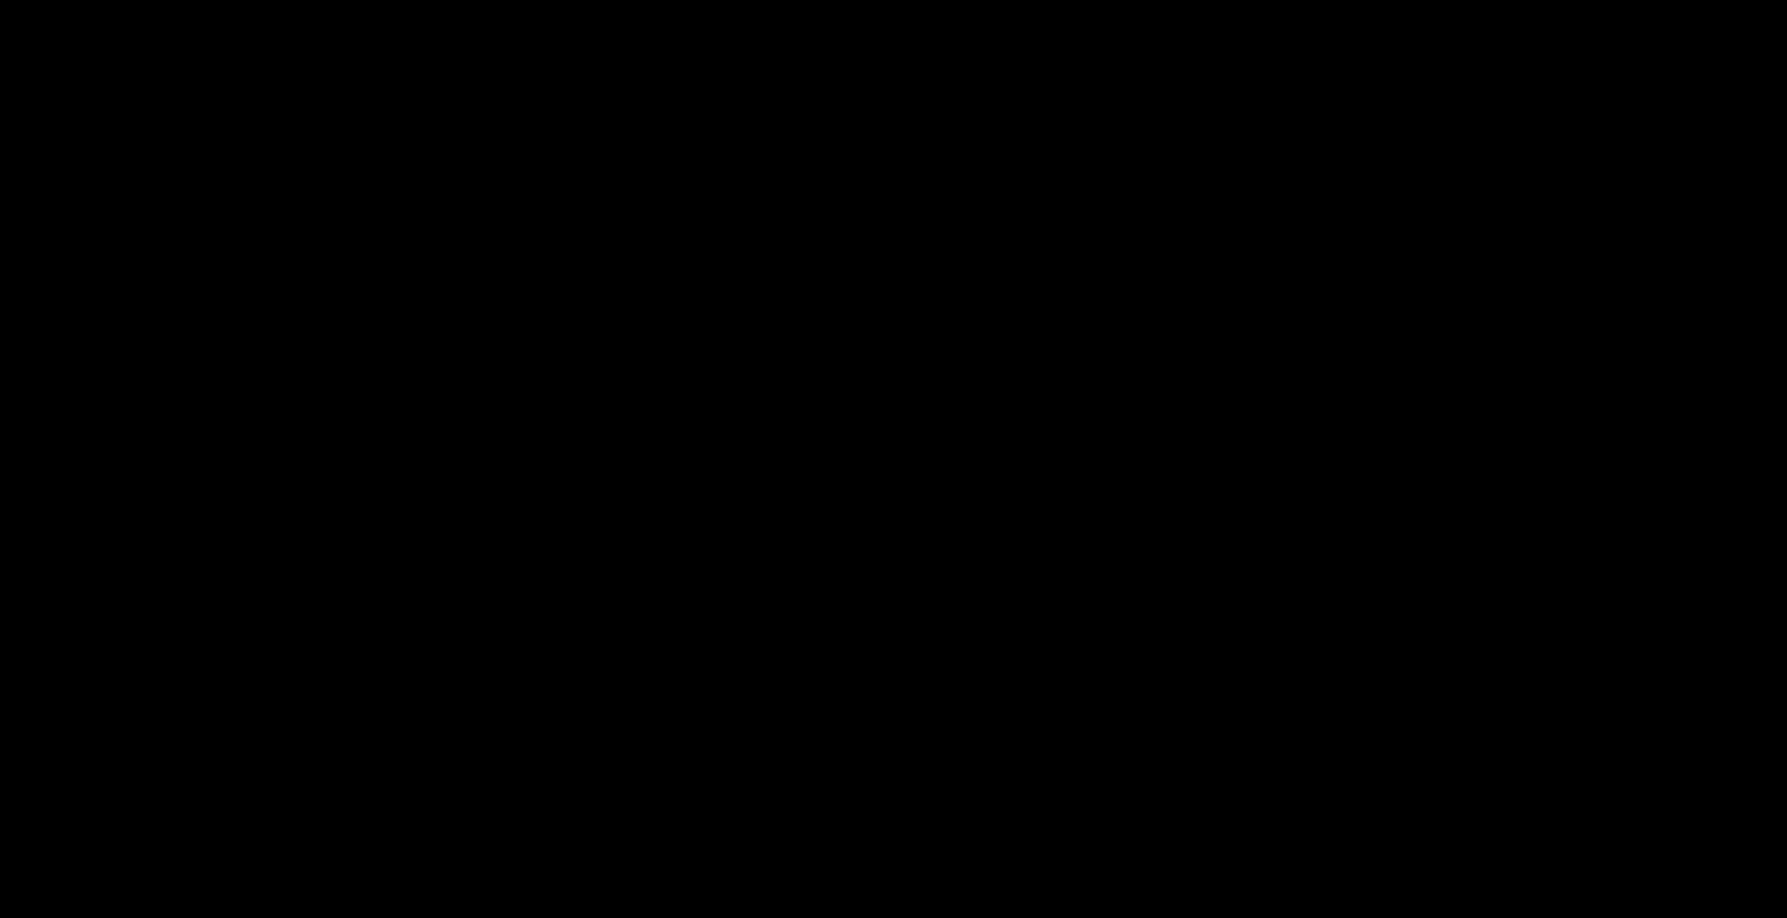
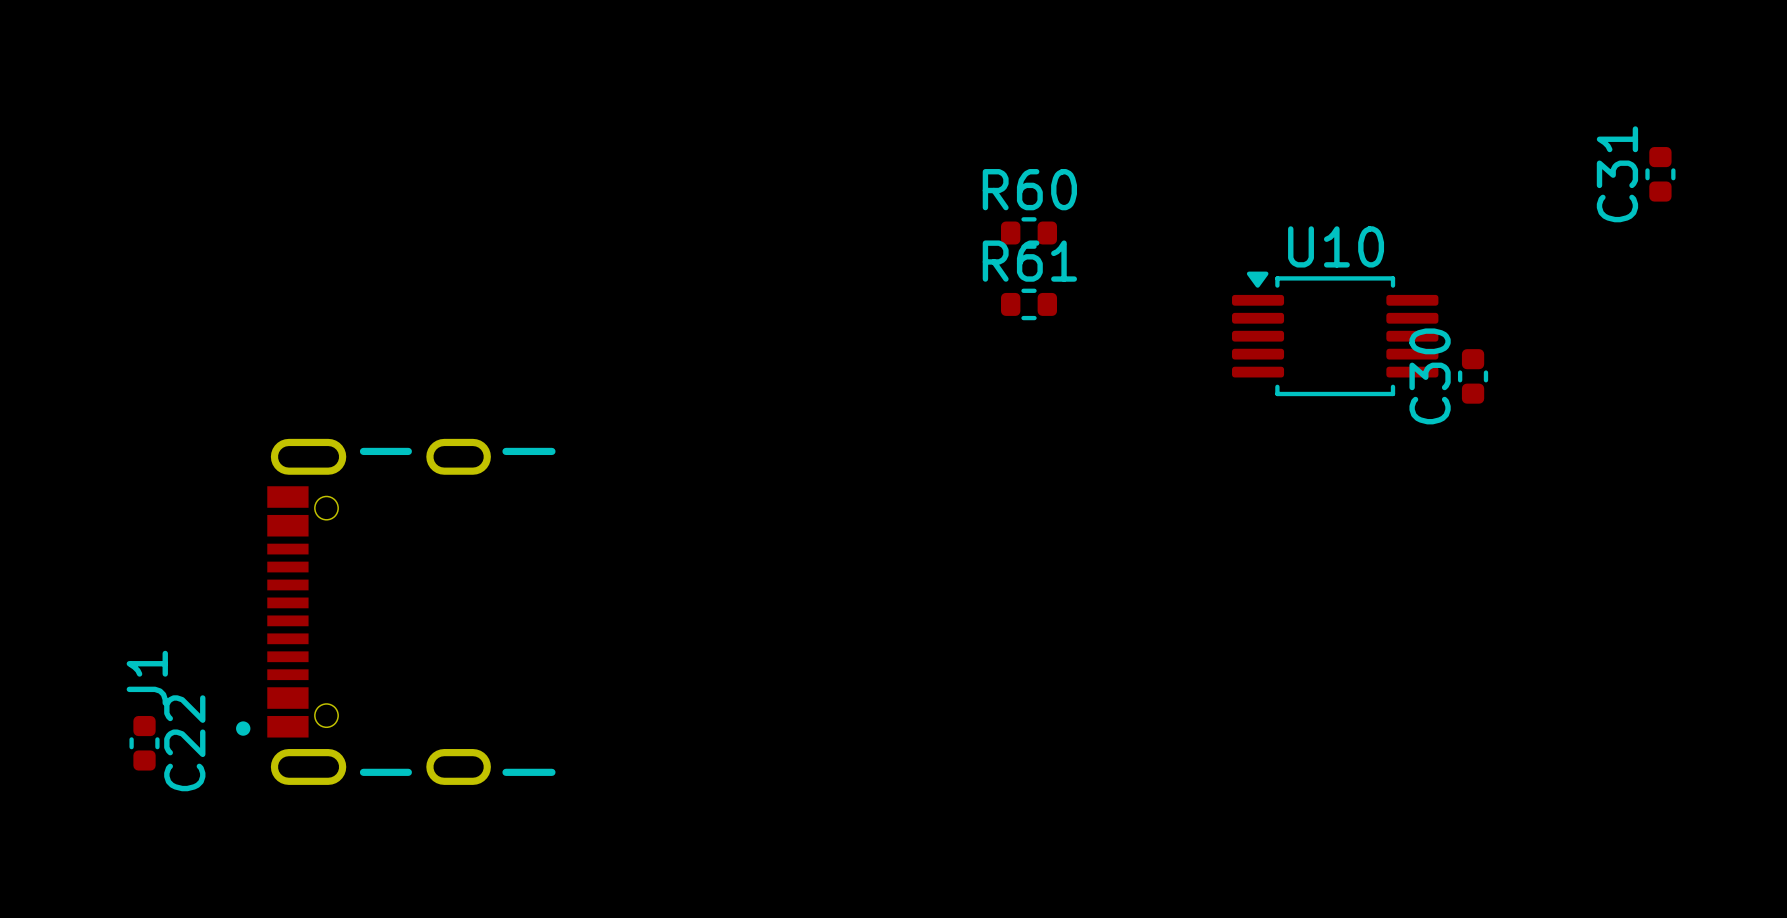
C31: none -> (1660, 174)
R60: none -> (1029, 233)
R61: none -> (1029, 304)
U10: none -> (1335, 333)
C30: none -> (1473, 376)
J1: none -> (395, 611)
C22: none -> (144, 743)

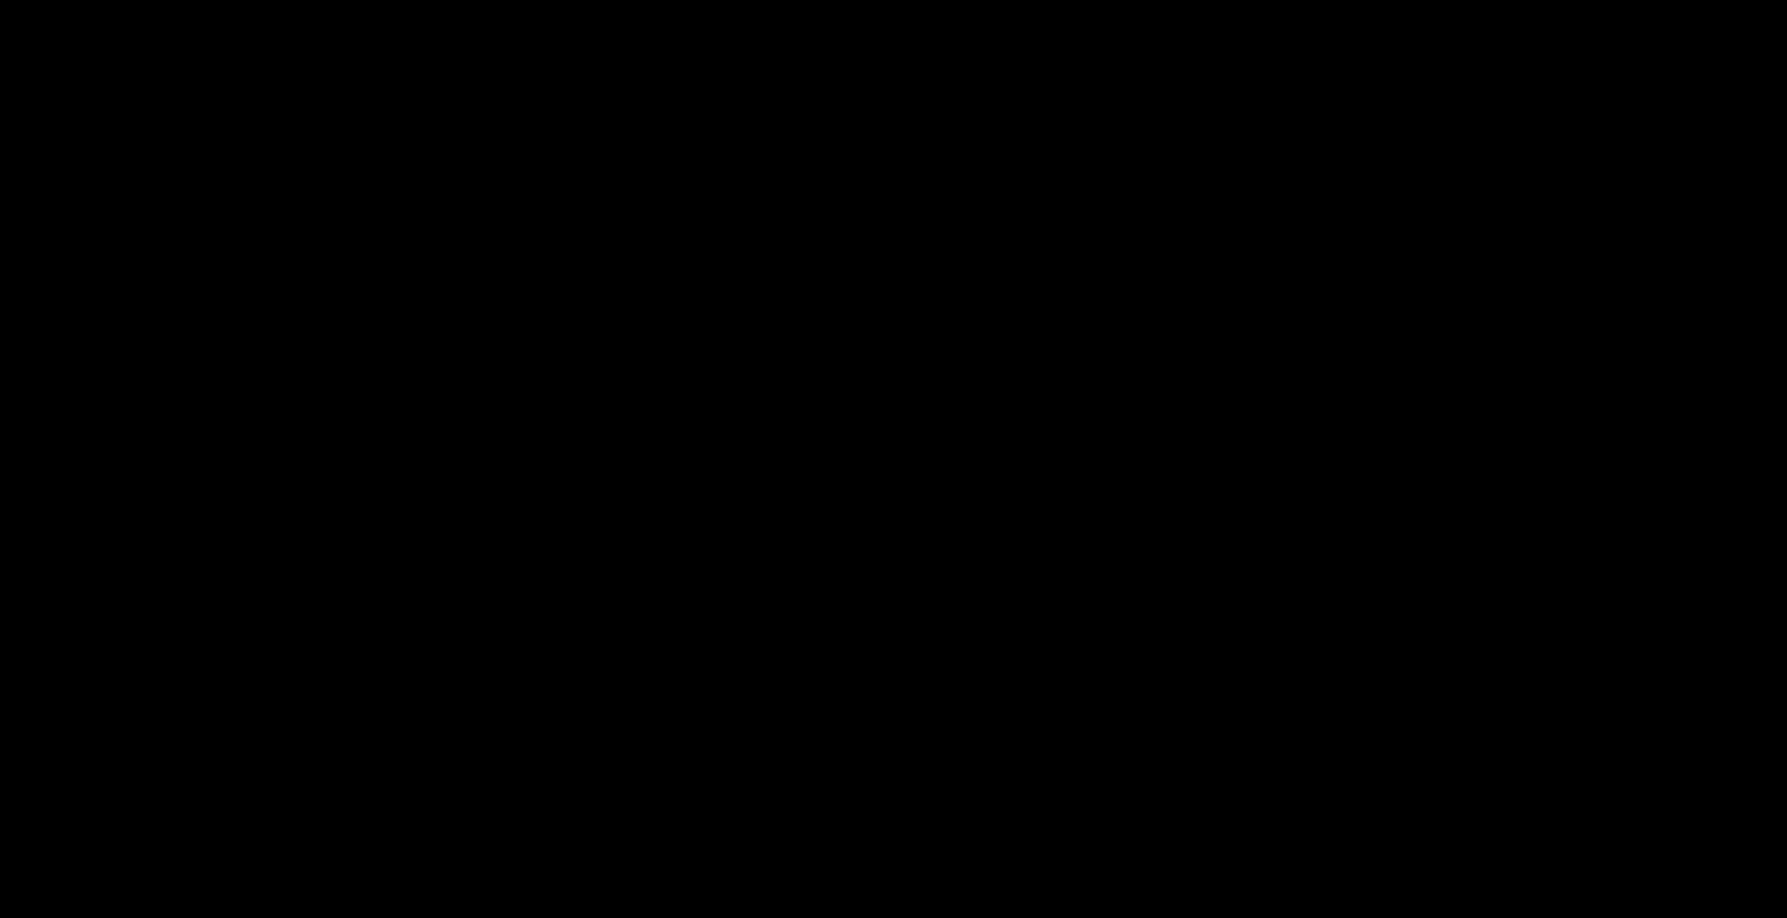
C31: (1660, 174) -> none
R60: (1029, 233) -> none
R61: (1029, 304) -> none
U10: (1335, 333) -> none
C30: (1473, 376) -> none
J1: (395, 611) -> none
C22: (144, 743) -> none

